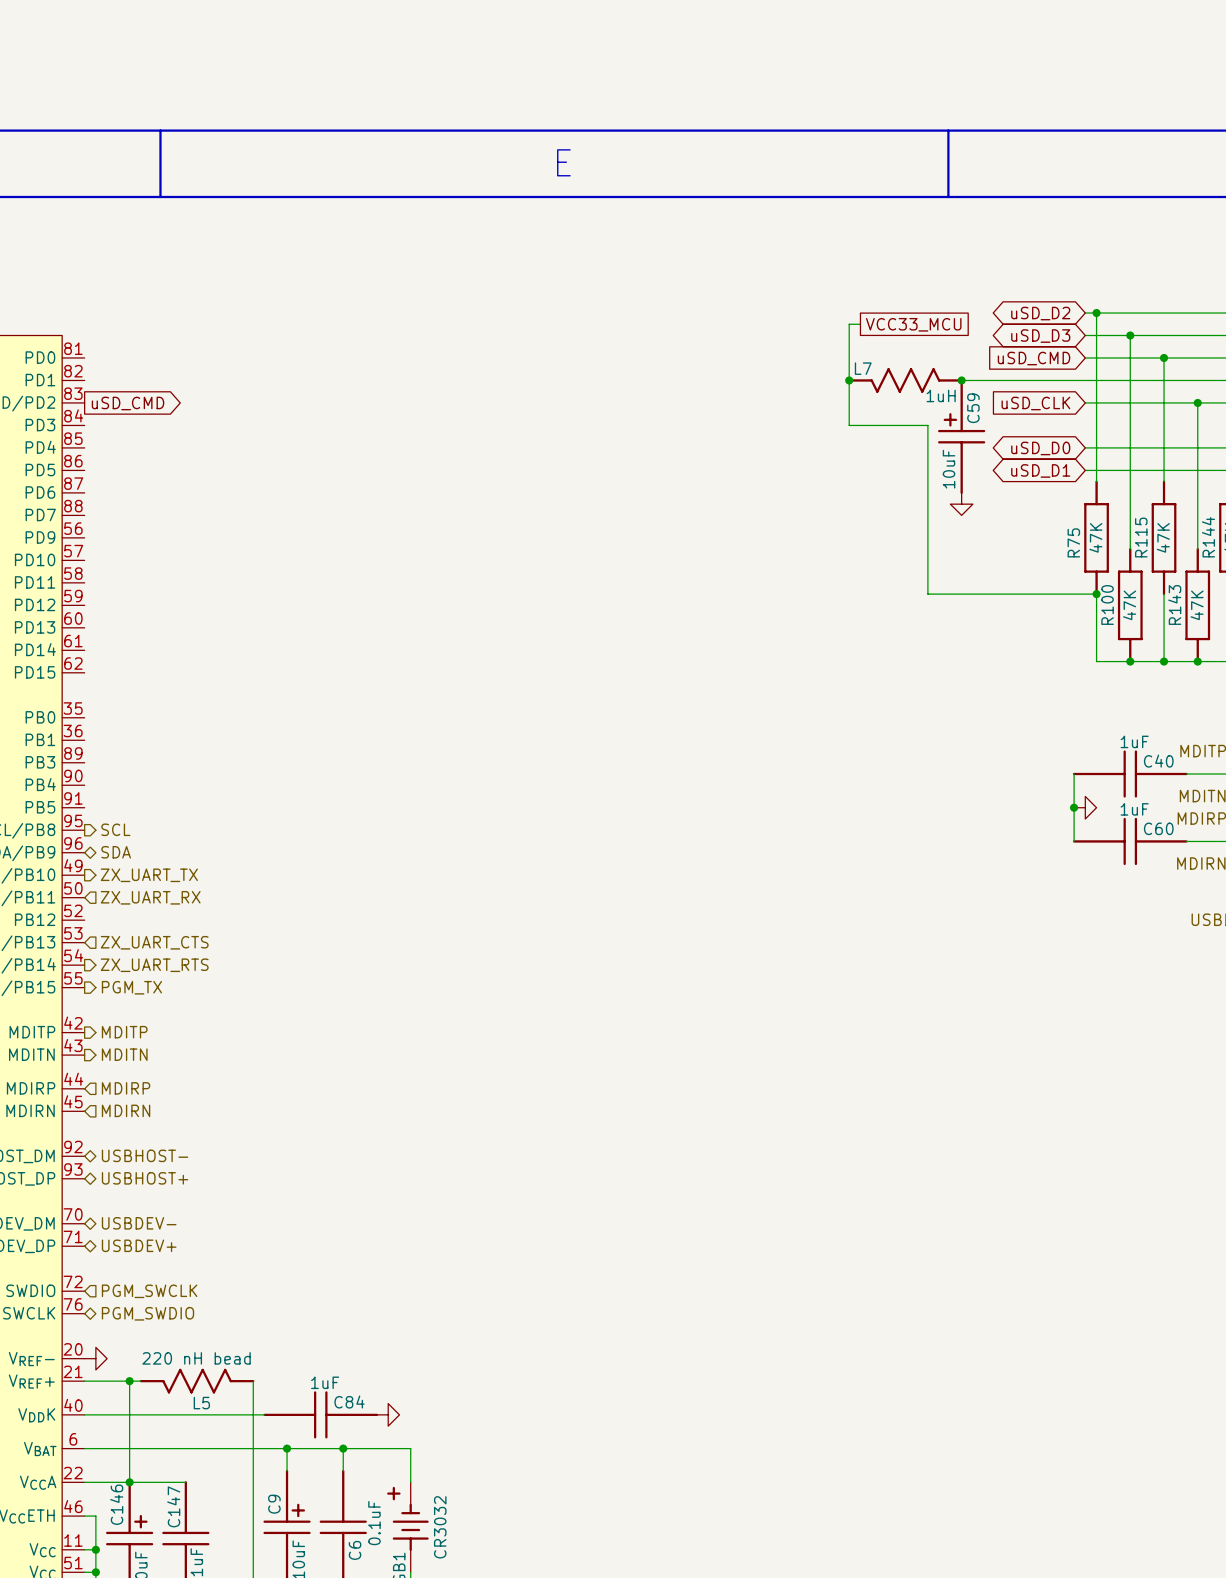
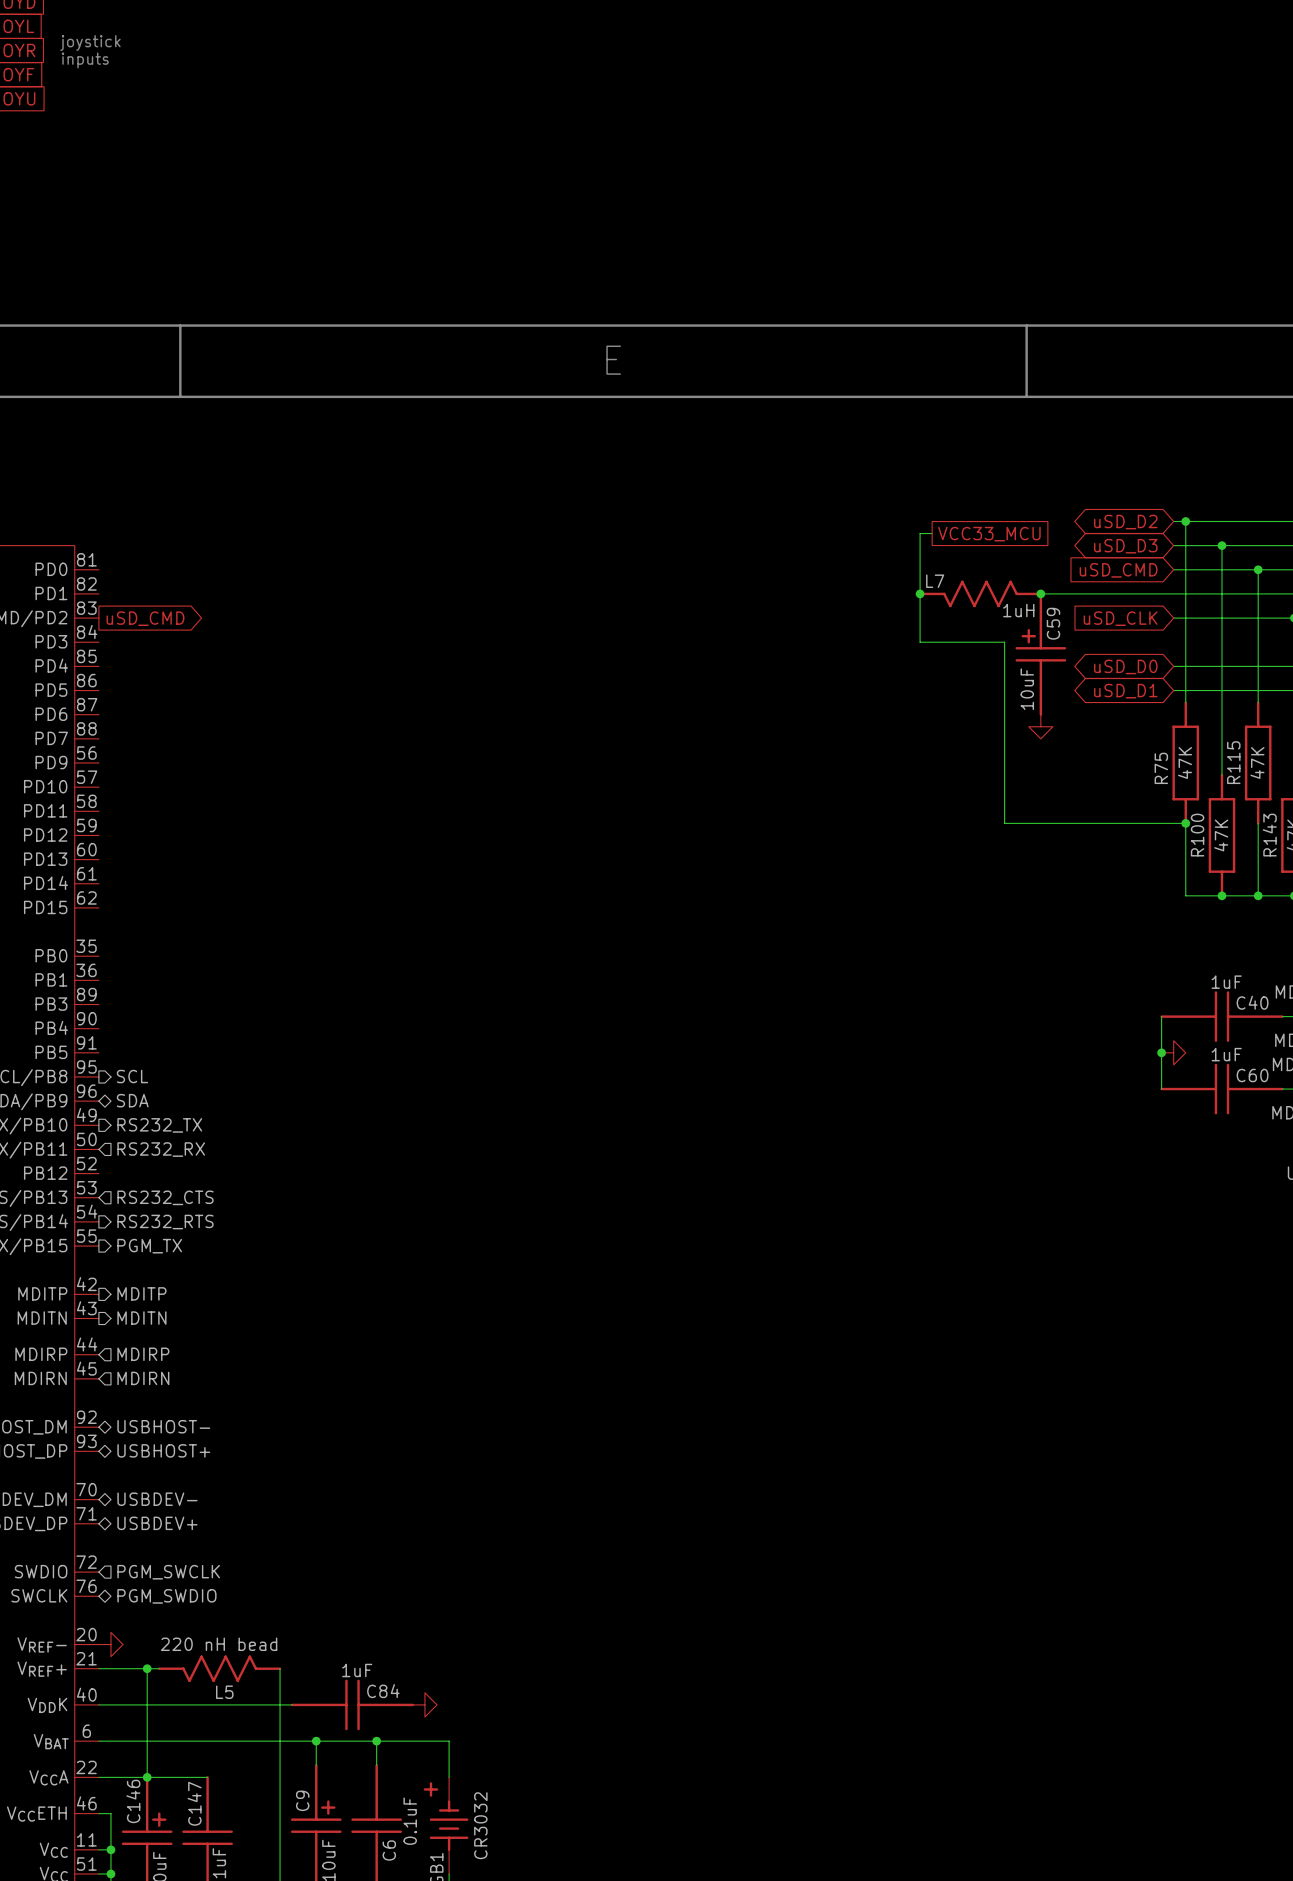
hierarchical label: ZX_UART_TX (149, 875) -> RS232_TX (159, 1125)
hierarchical label: ZX_UART_RX (150, 897) -> RS232_RX (161, 1149)
hierarchical label: ZX_UART_CTS (154, 942) -> RS232_CTS (165, 1197)
hierarchical label: ZX_UART_RTS (154, 965) -> RS232_RTS (165, 1222)

